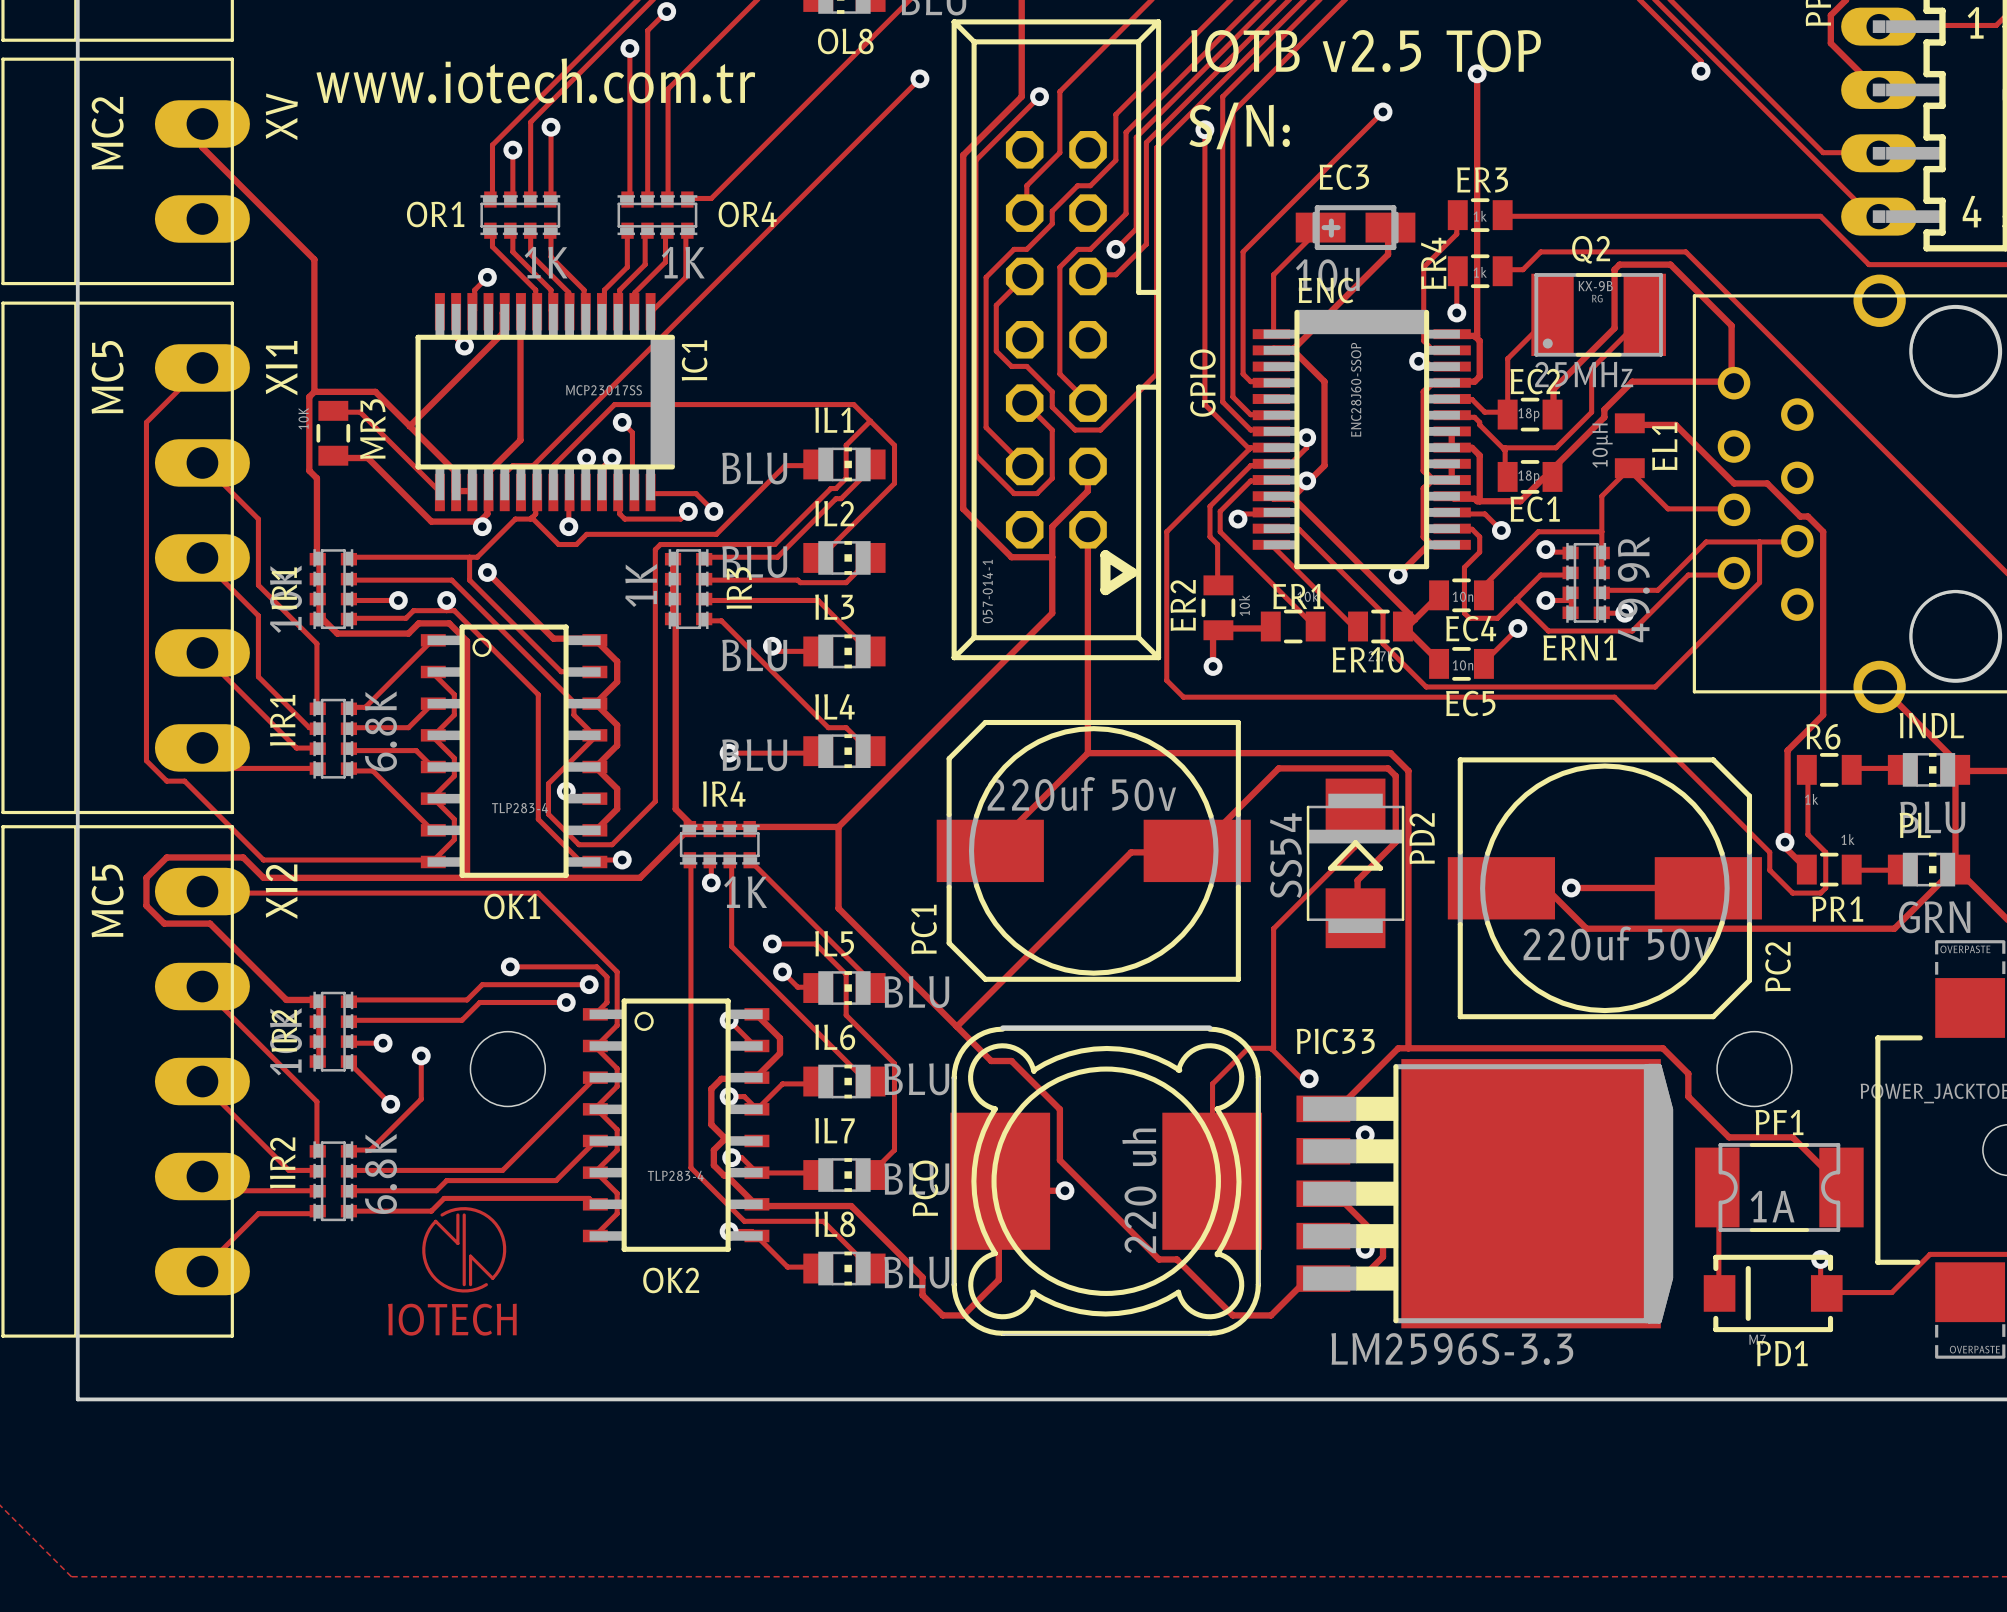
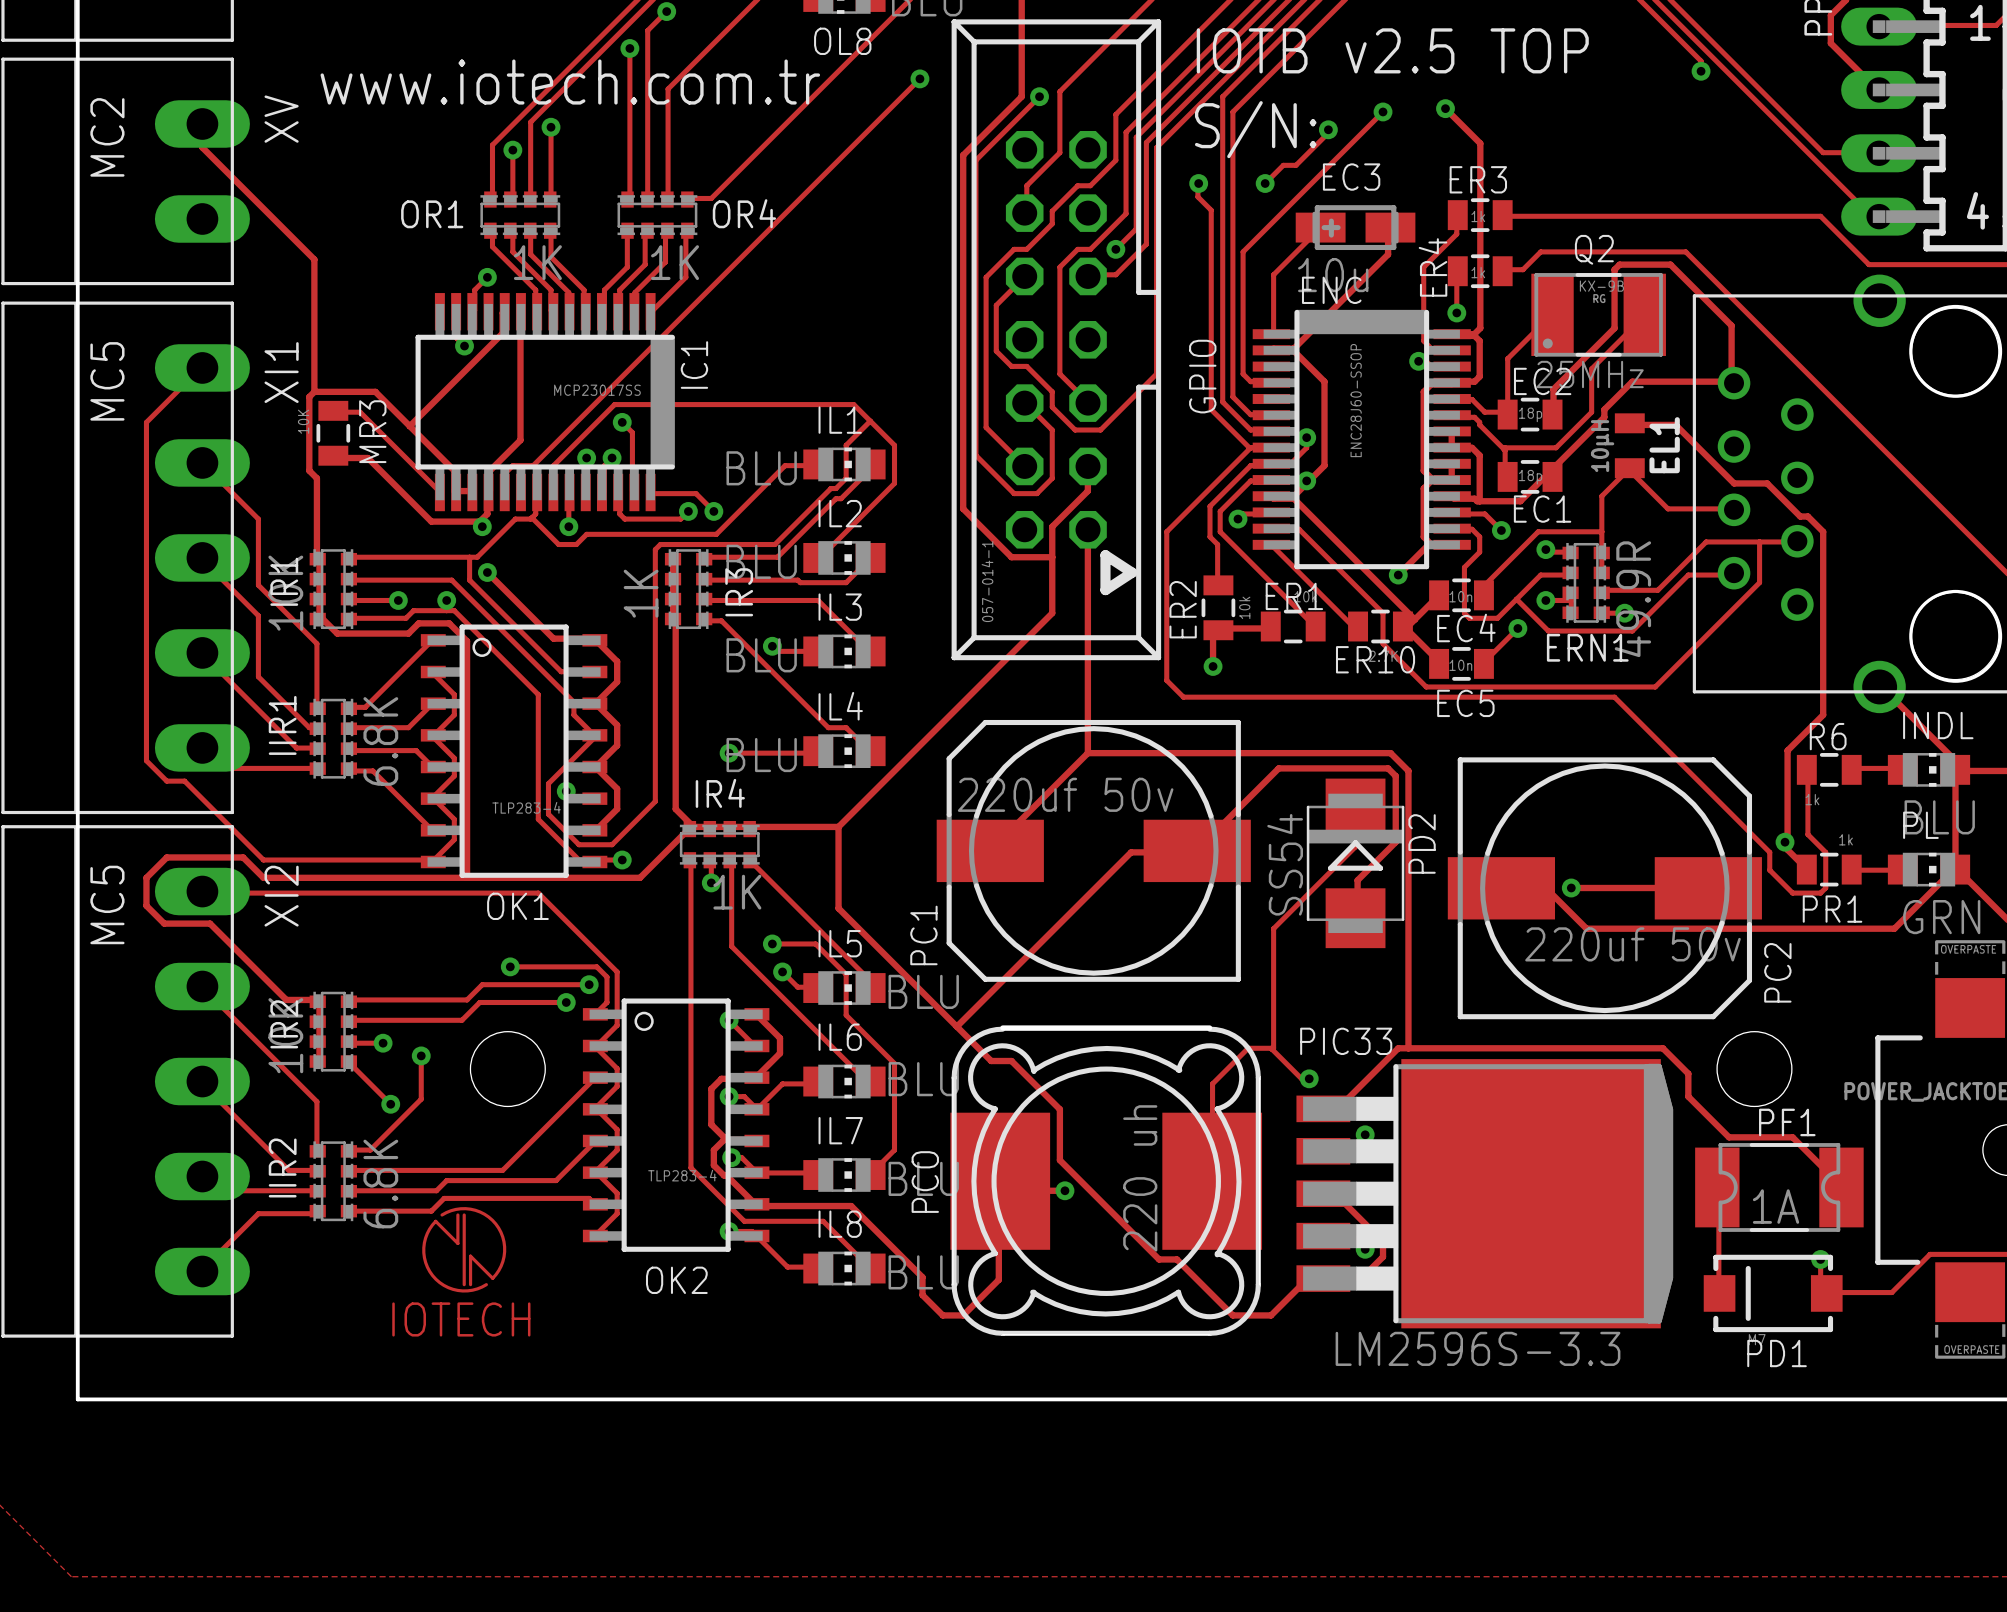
track: (1477, 73) (1475, 337) -> none
via position: (1477, 73) -> (1445, 108)
track: none -> (1445, 108) (1480, 143) (1480, 328) (1474, 334) (1452, 334)
track: (1204, 129) (1204, 404) (1249, 449) -> none
via: (1204, 129) -> none
track: none -> (1328, 129) (1328, 132) (1296, 165) (1283, 165) (1265, 183)
via: none -> (1328, 129)
track: none -> (1198, 183) (1197, 196) (1211, 210) (1211, 409) (1250, 447)
via: none -> (1198, 183)
via: none -> (1265, 183)

